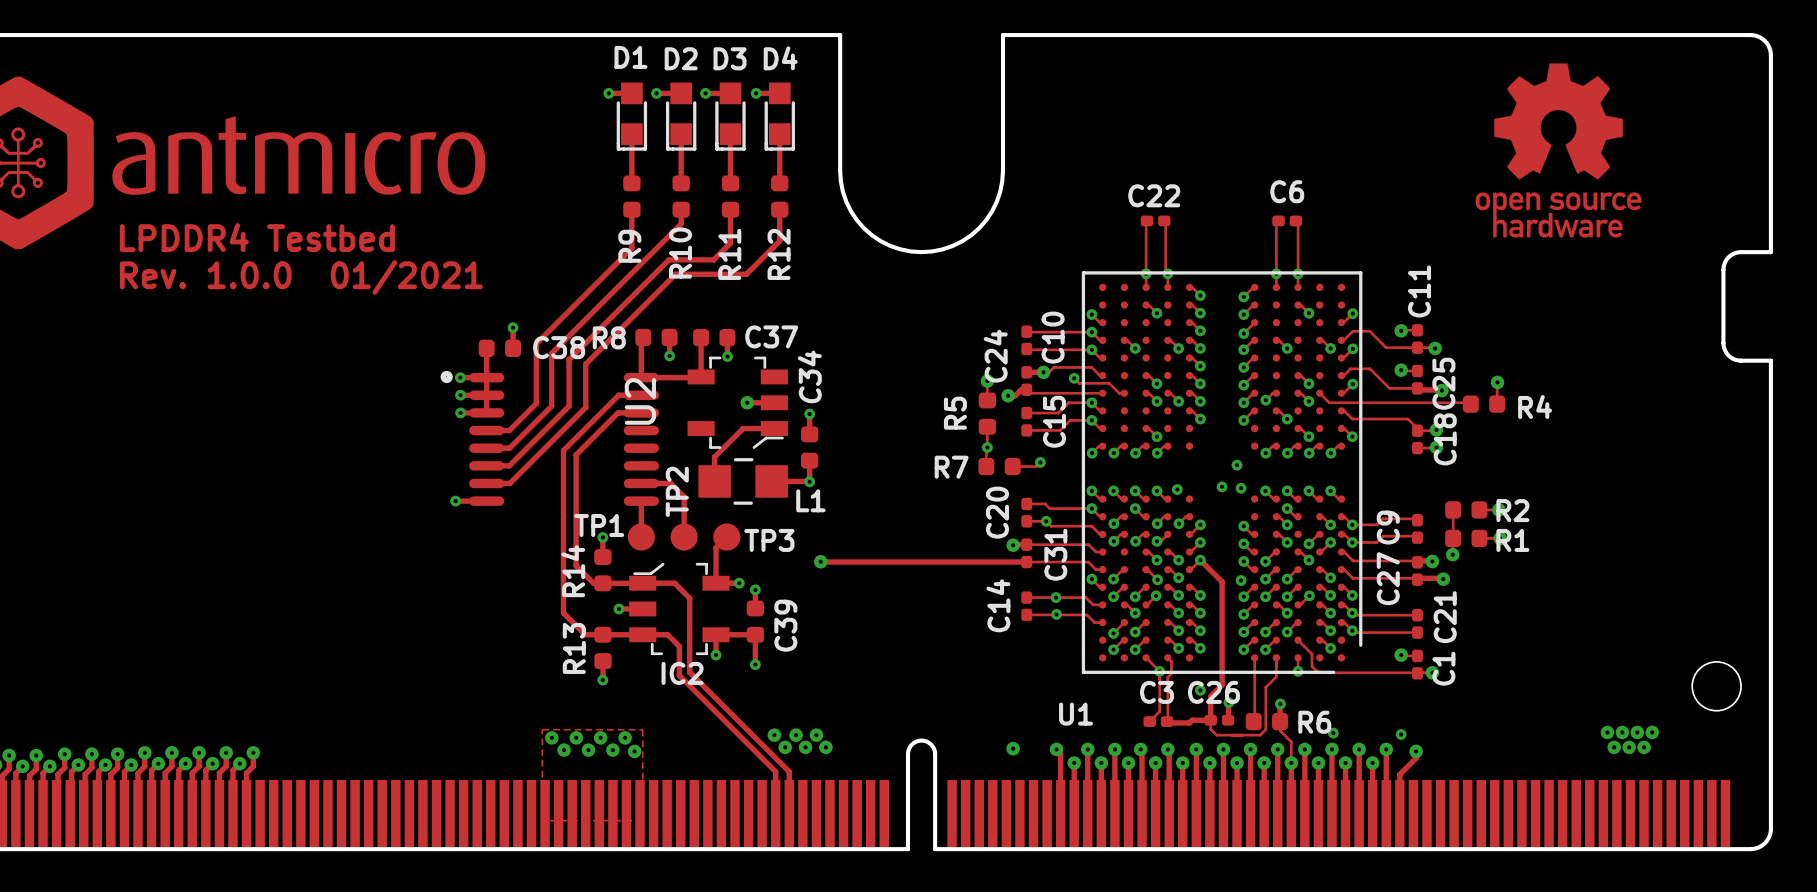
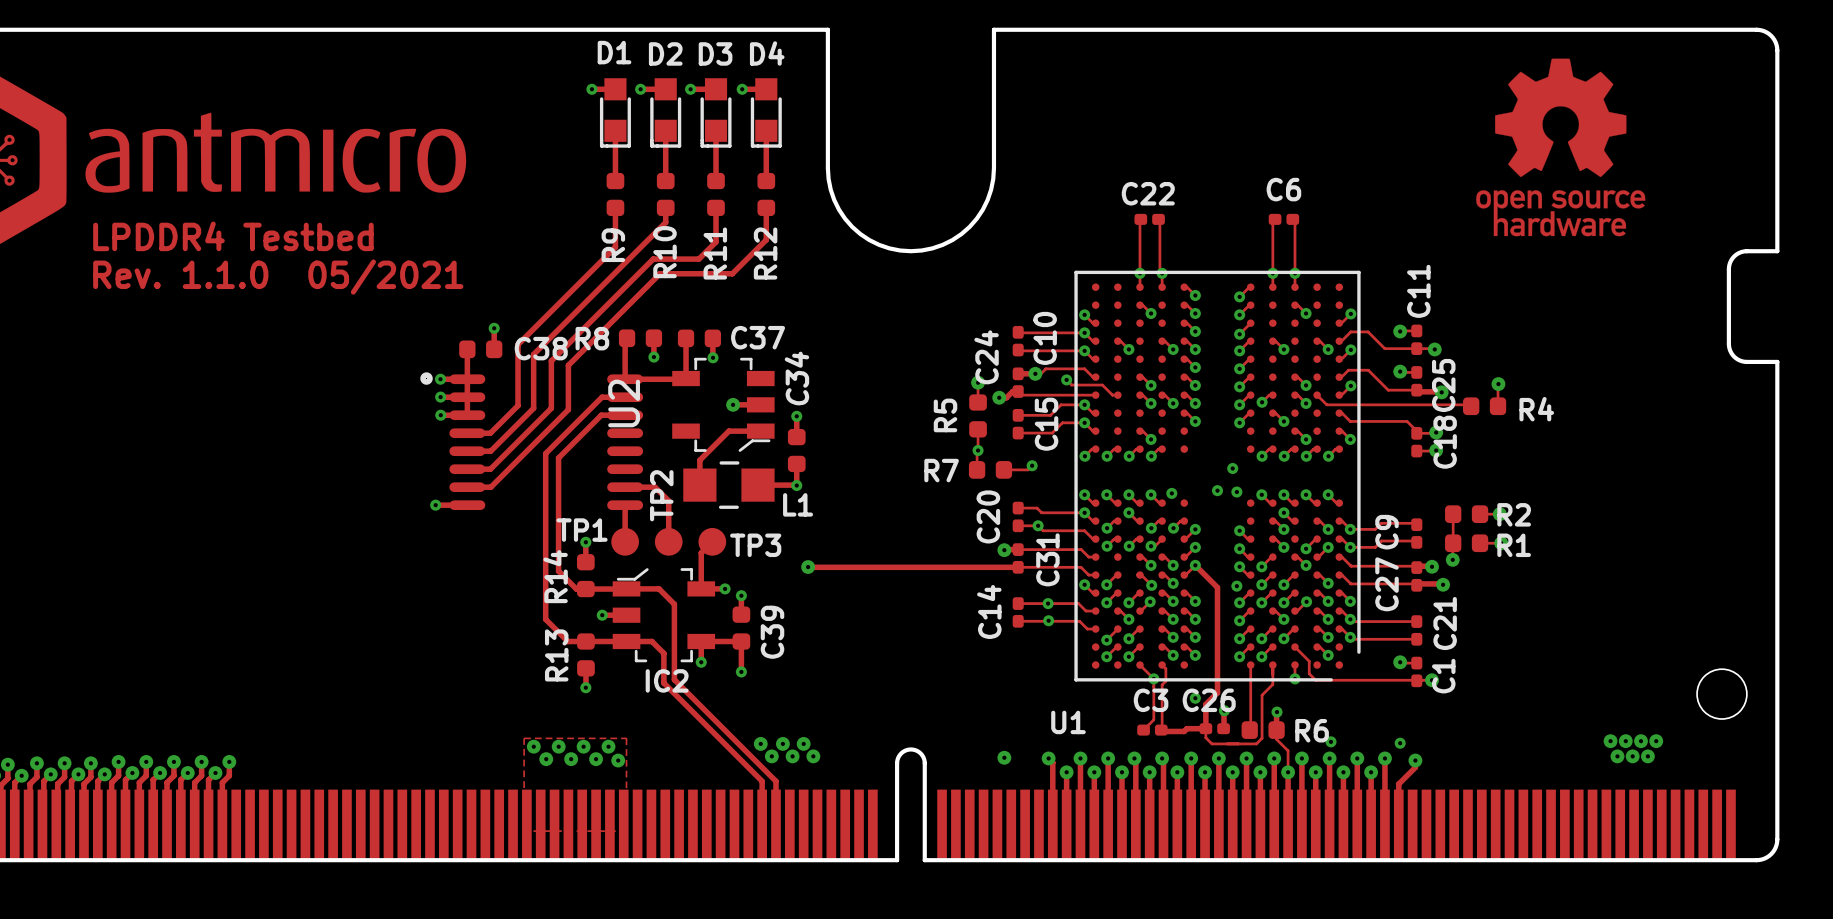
text: Rev. 1.0.0 01/2021 (301, 277) -> Rev. 1.1.0 05/2021 (278, 277)

